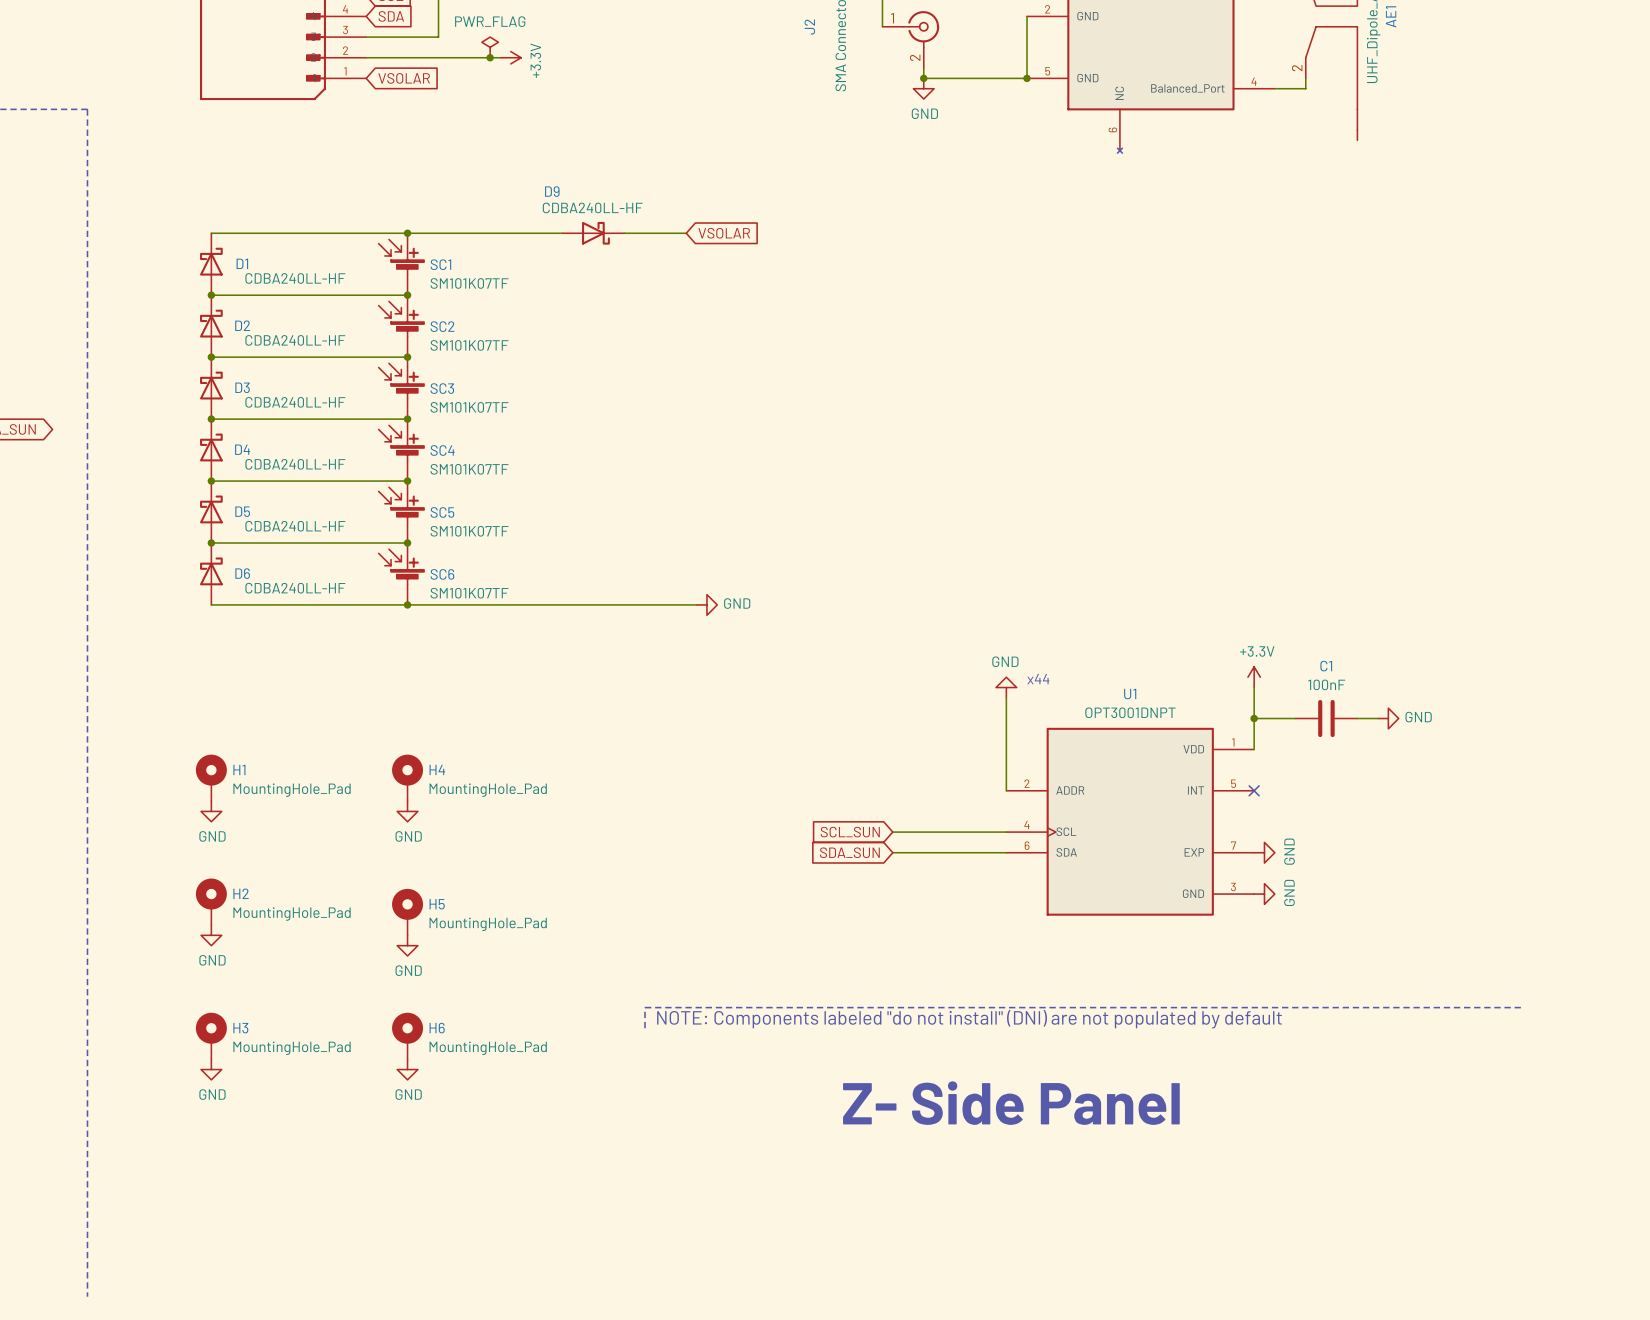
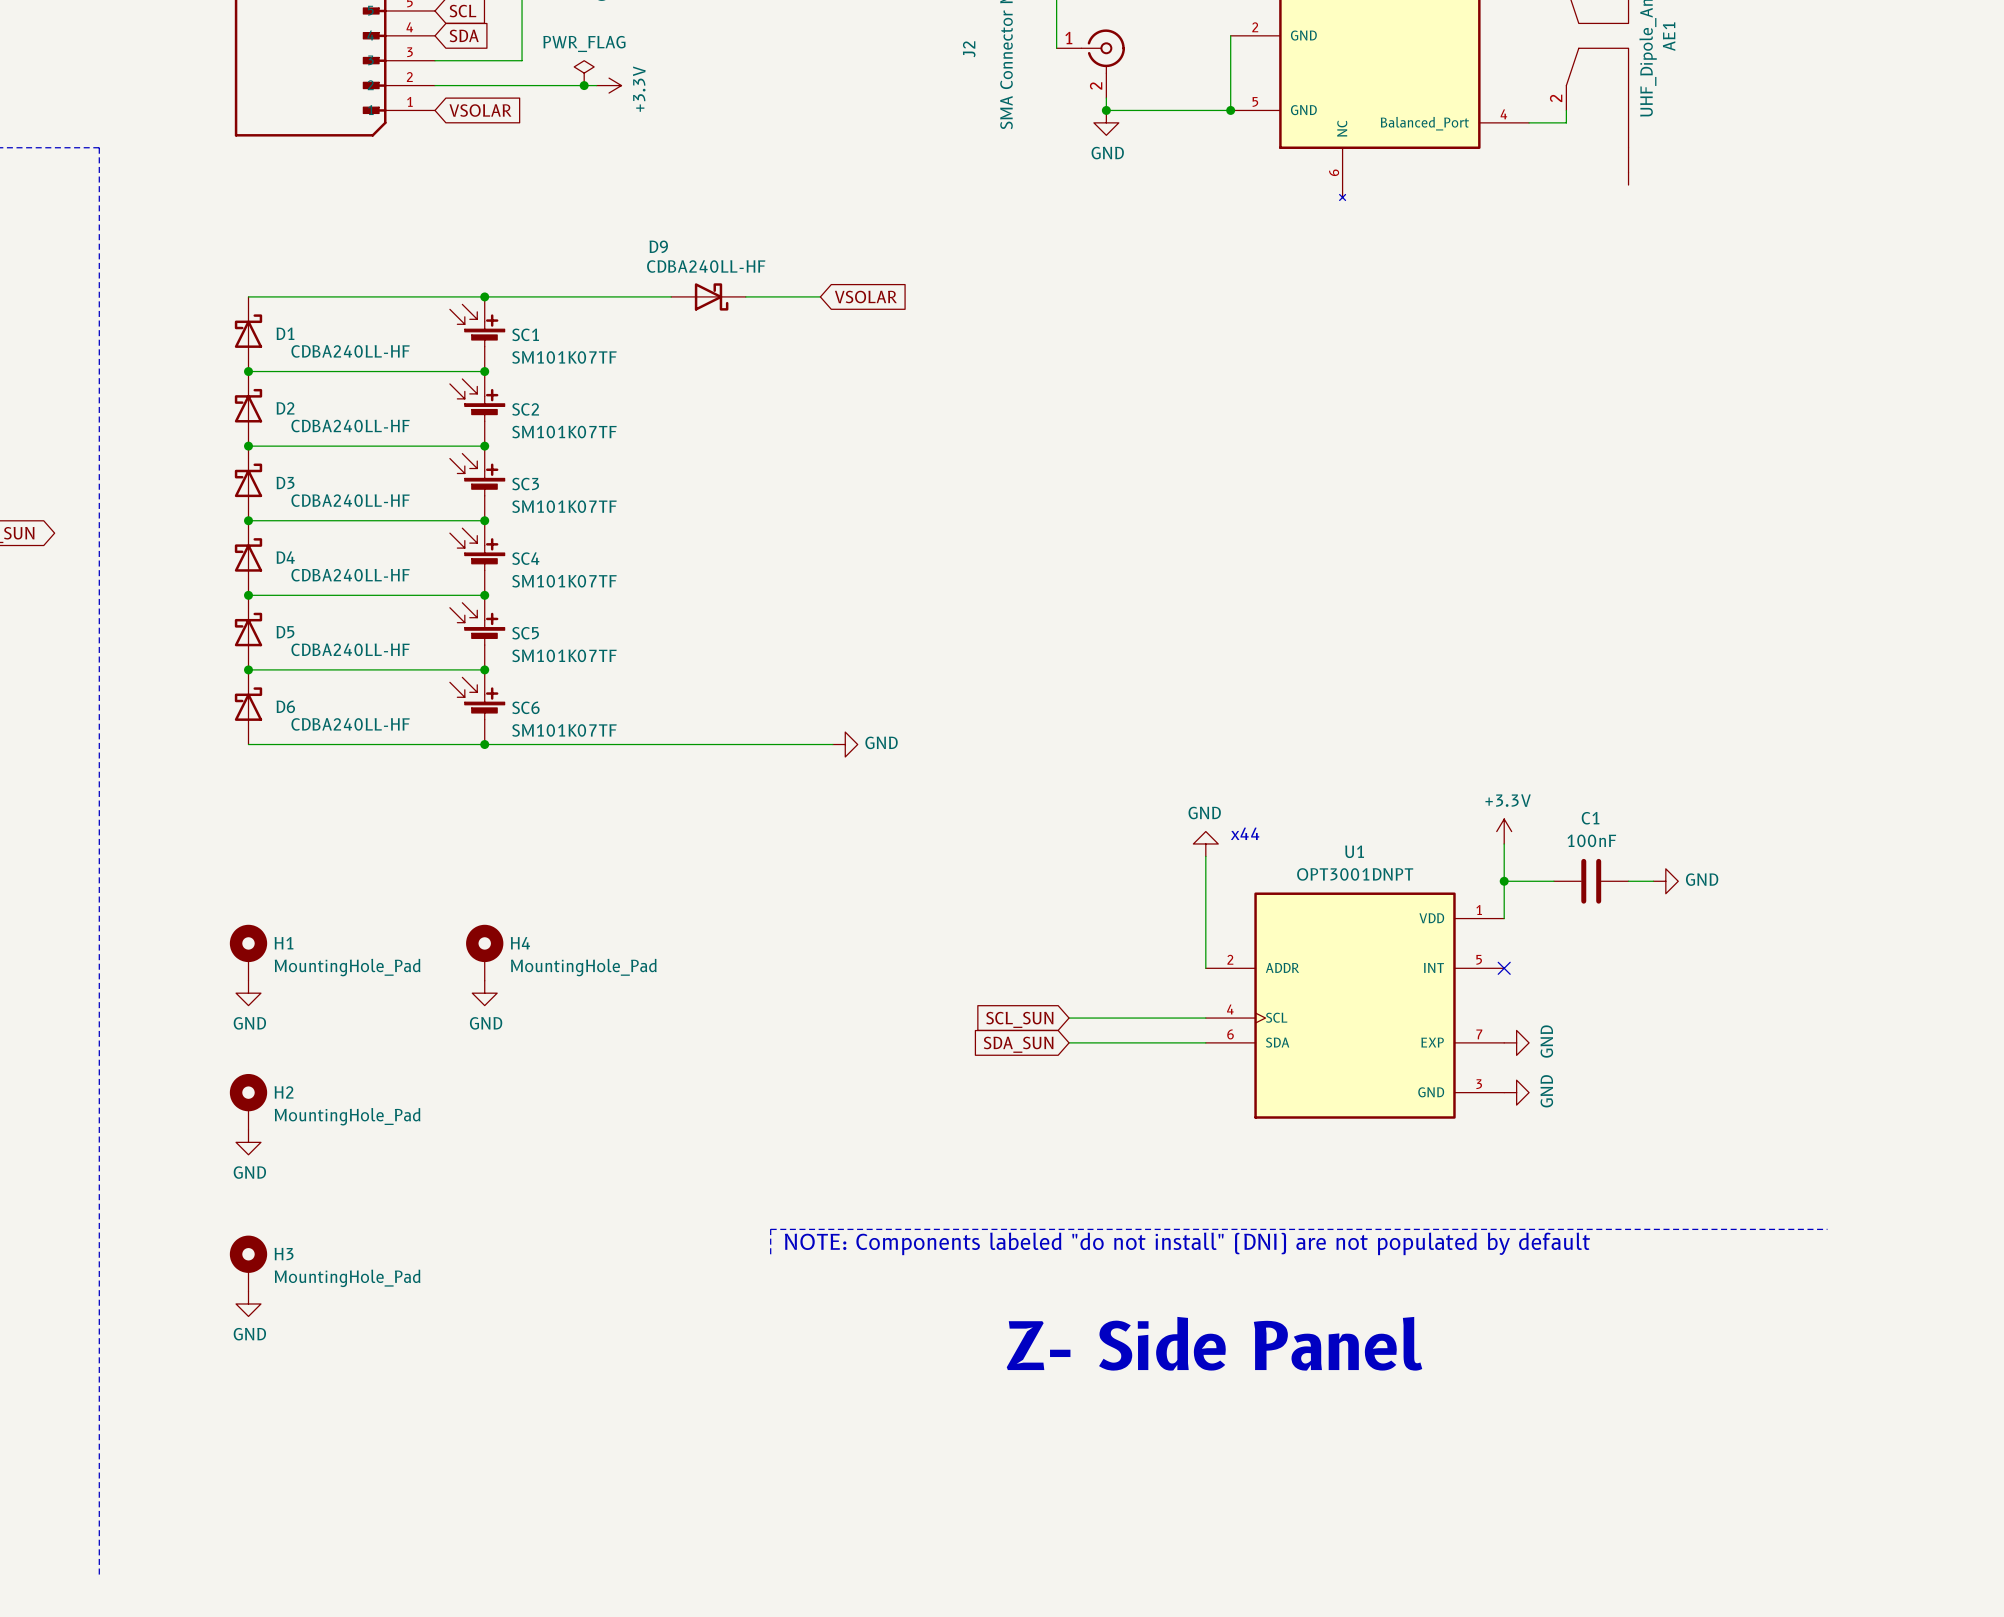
H5: MountingHole_Pad (407, 912) -> none
power symbol: GND (407, 945) -> none
H6: MountingHole_Pad (407, 1035) -> none
power symbol: GND (407, 1069) -> none

